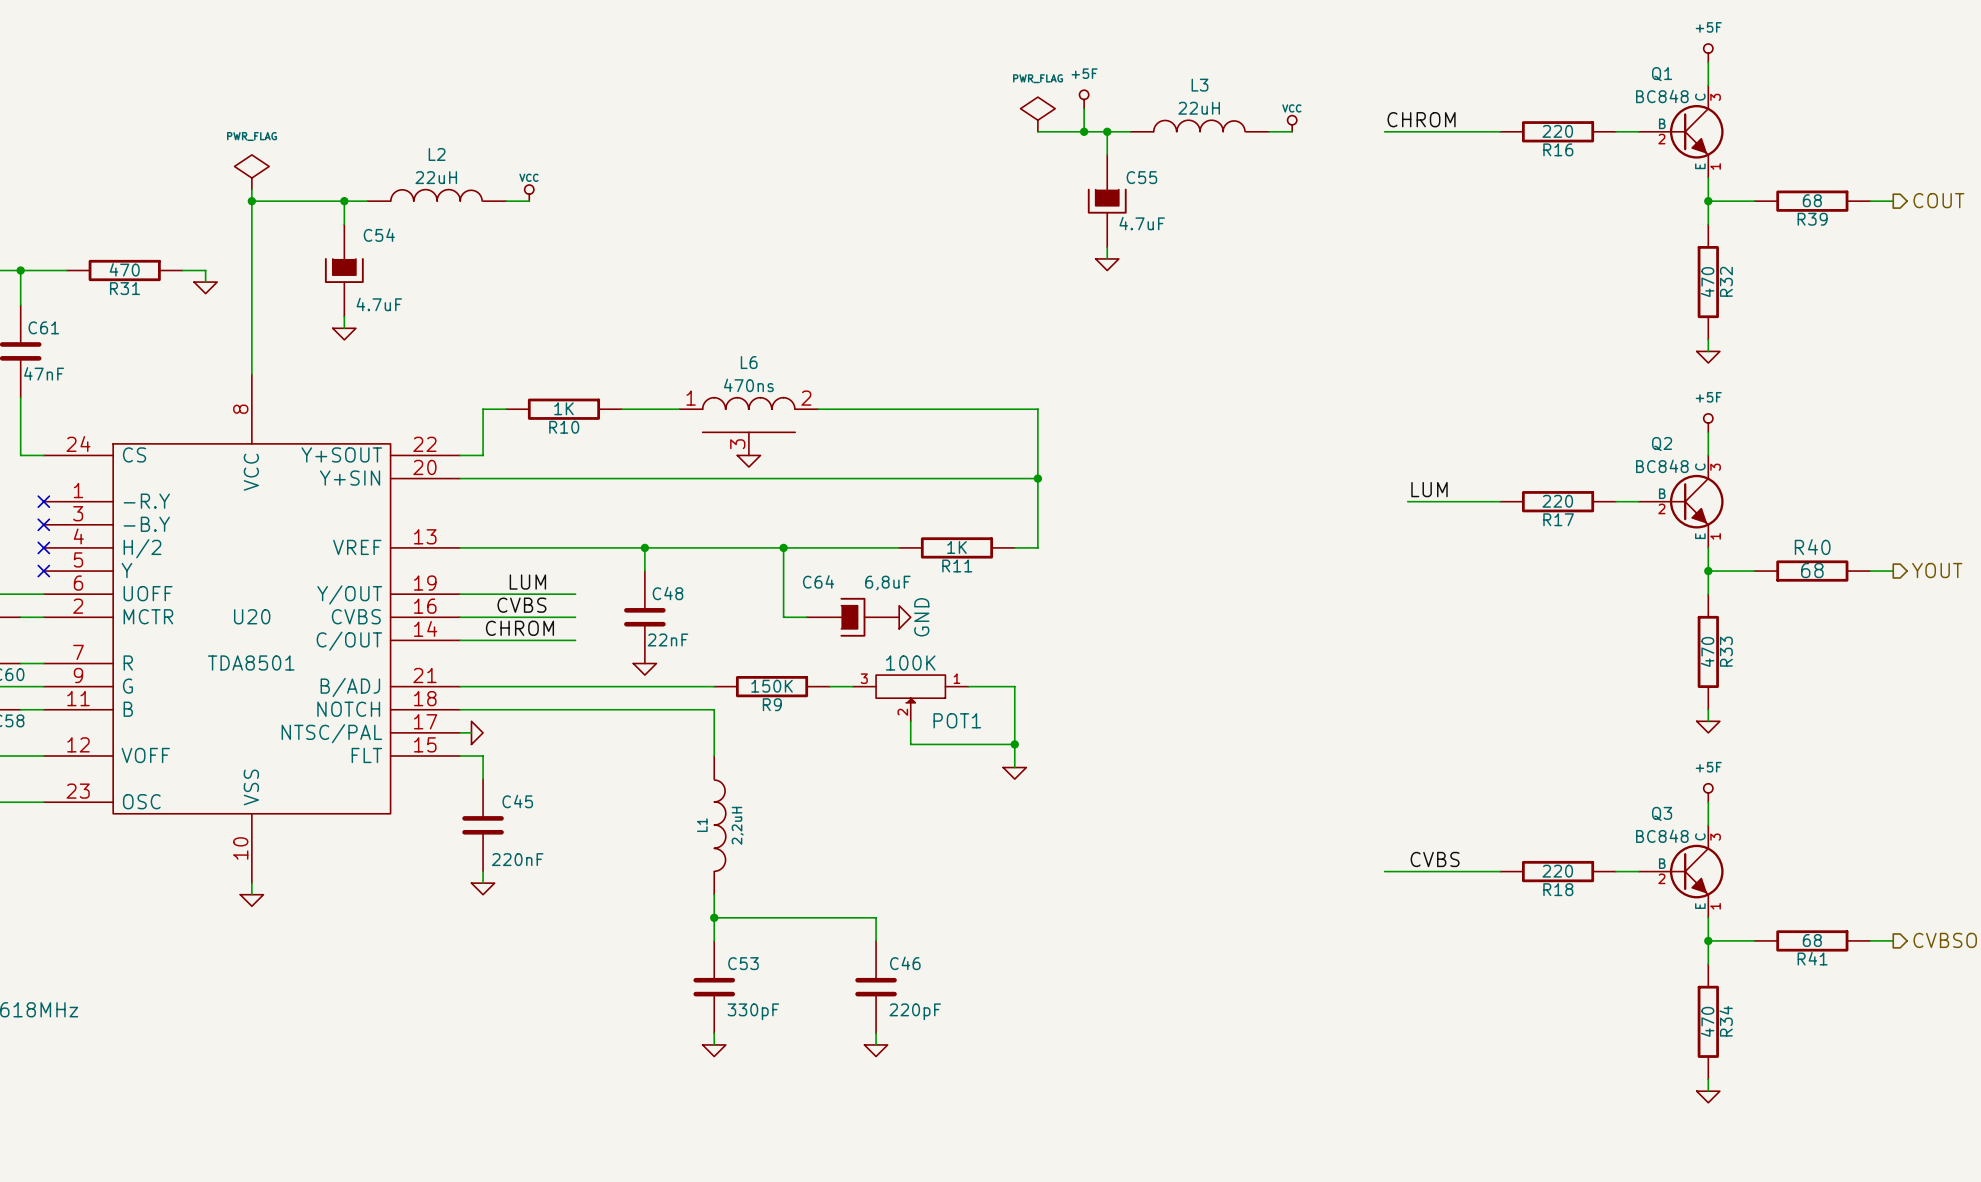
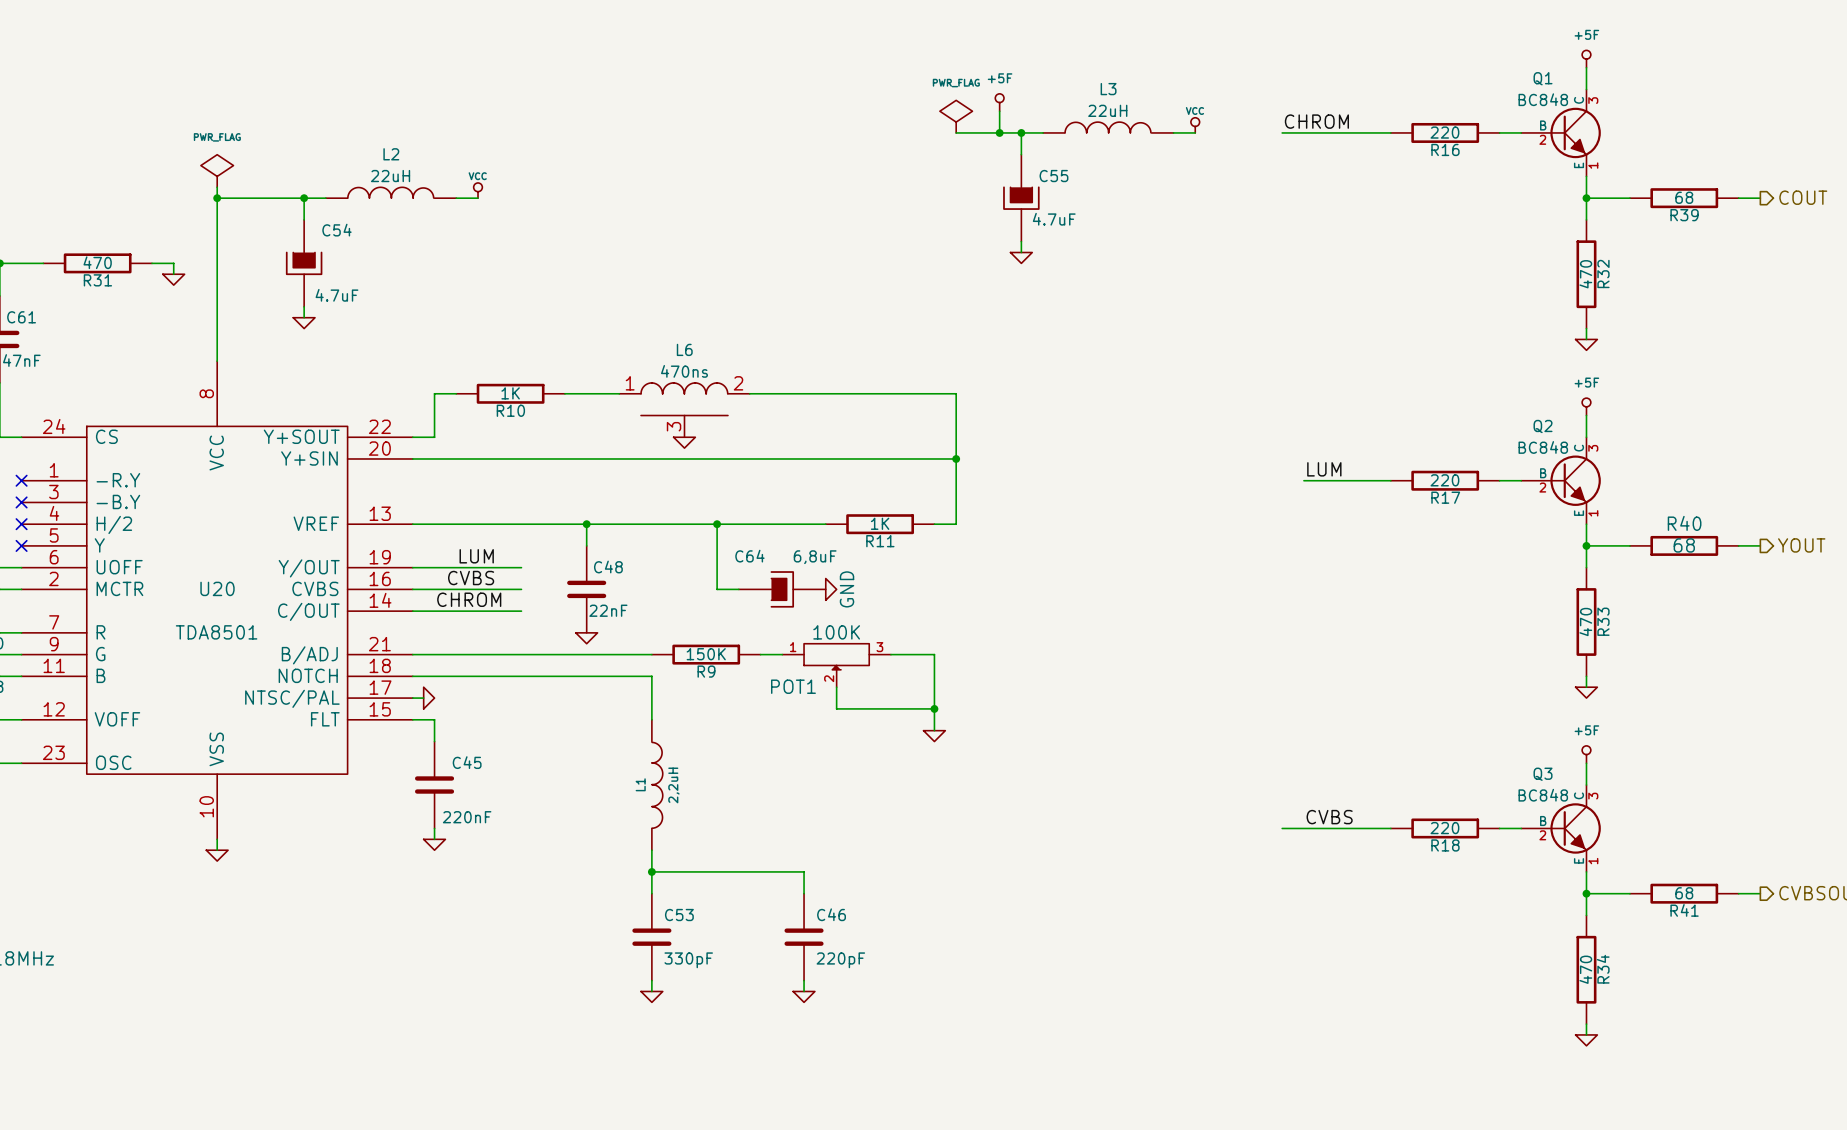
POT1 flip: as is (910, 688) -> left-right (836, 656)

